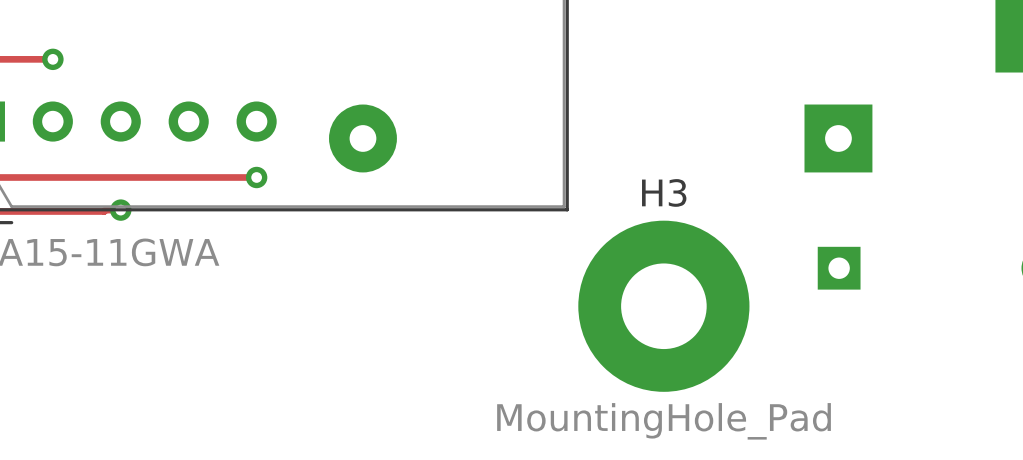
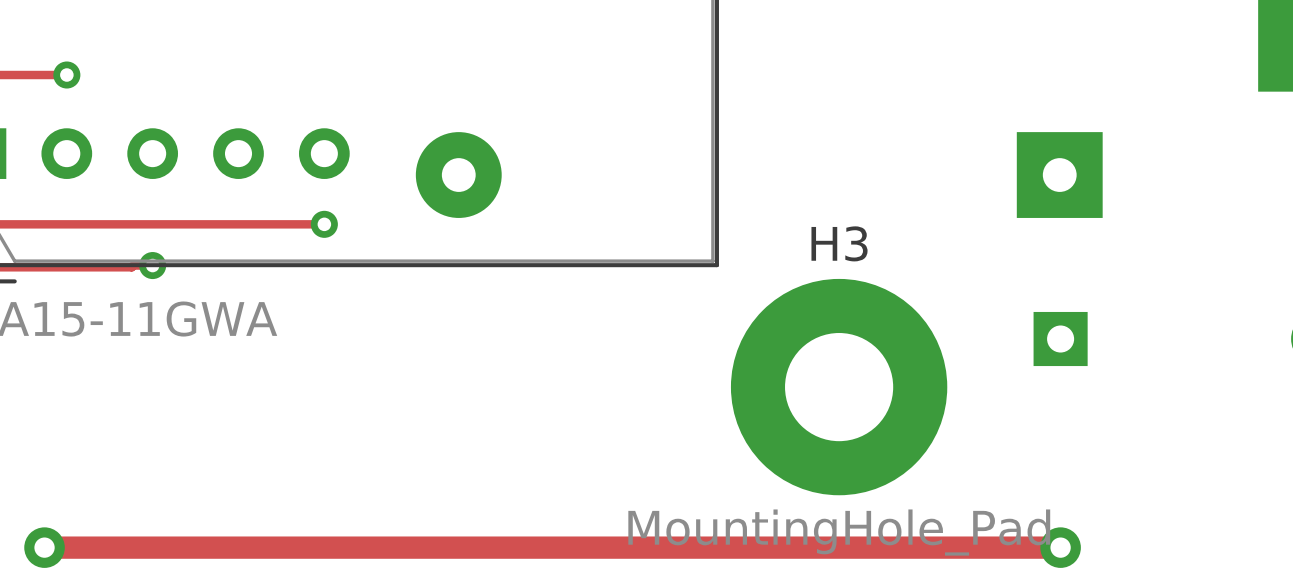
track: none -> (44, 547) (1060, 547)
via: none -> (44, 547)
via: none -> (1060, 547)

